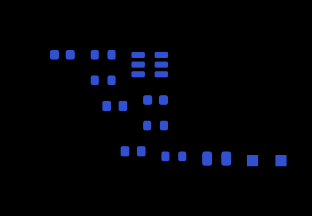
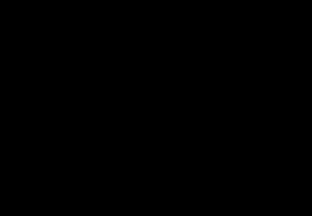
part: (62, 54) -> none
part: (103, 54) -> none
part: (149, 64) -> none
part: (103, 80) -> none
part: (155, 100) -> none
part: (114, 106) -> none
part: (155, 125) -> none
part: (133, 151) -> none
part: (173, 156) -> none
part: (216, 158) -> none
part: (266, 160) -> none

